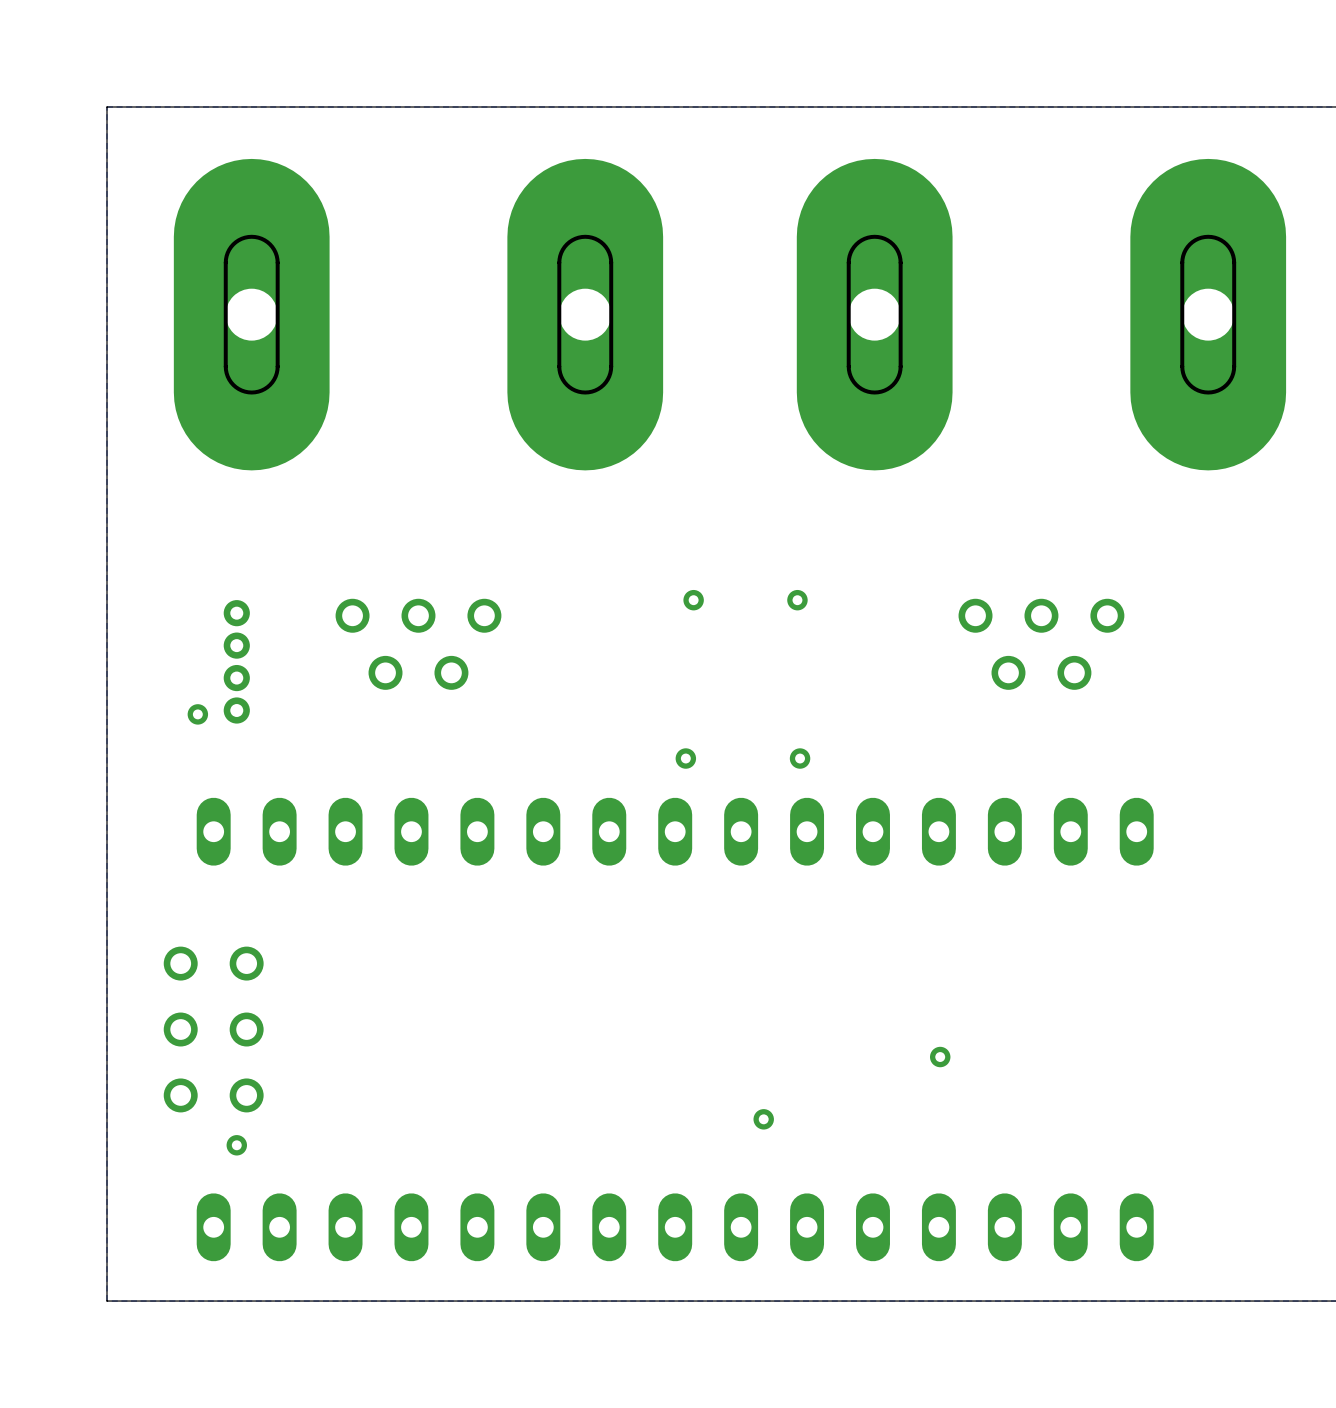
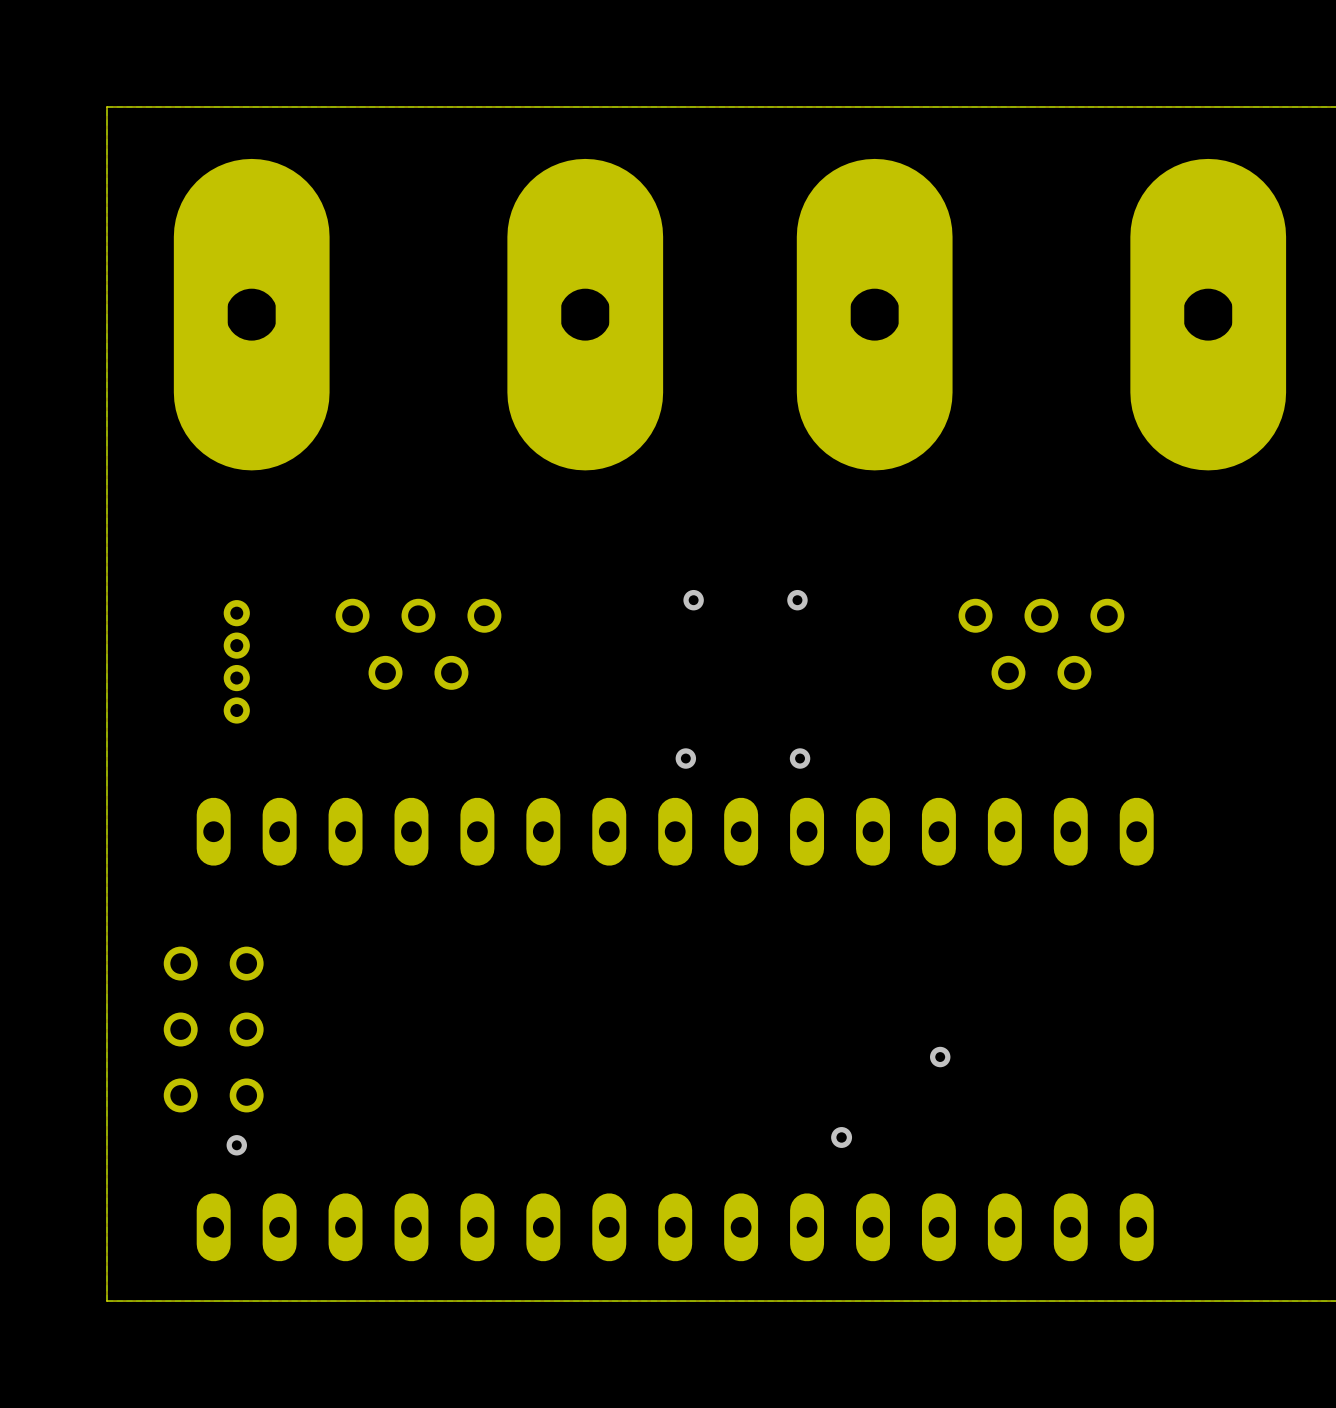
via: (197, 714) -> none
via: (763, 1119) -> none
via: none -> (841, 1137)

